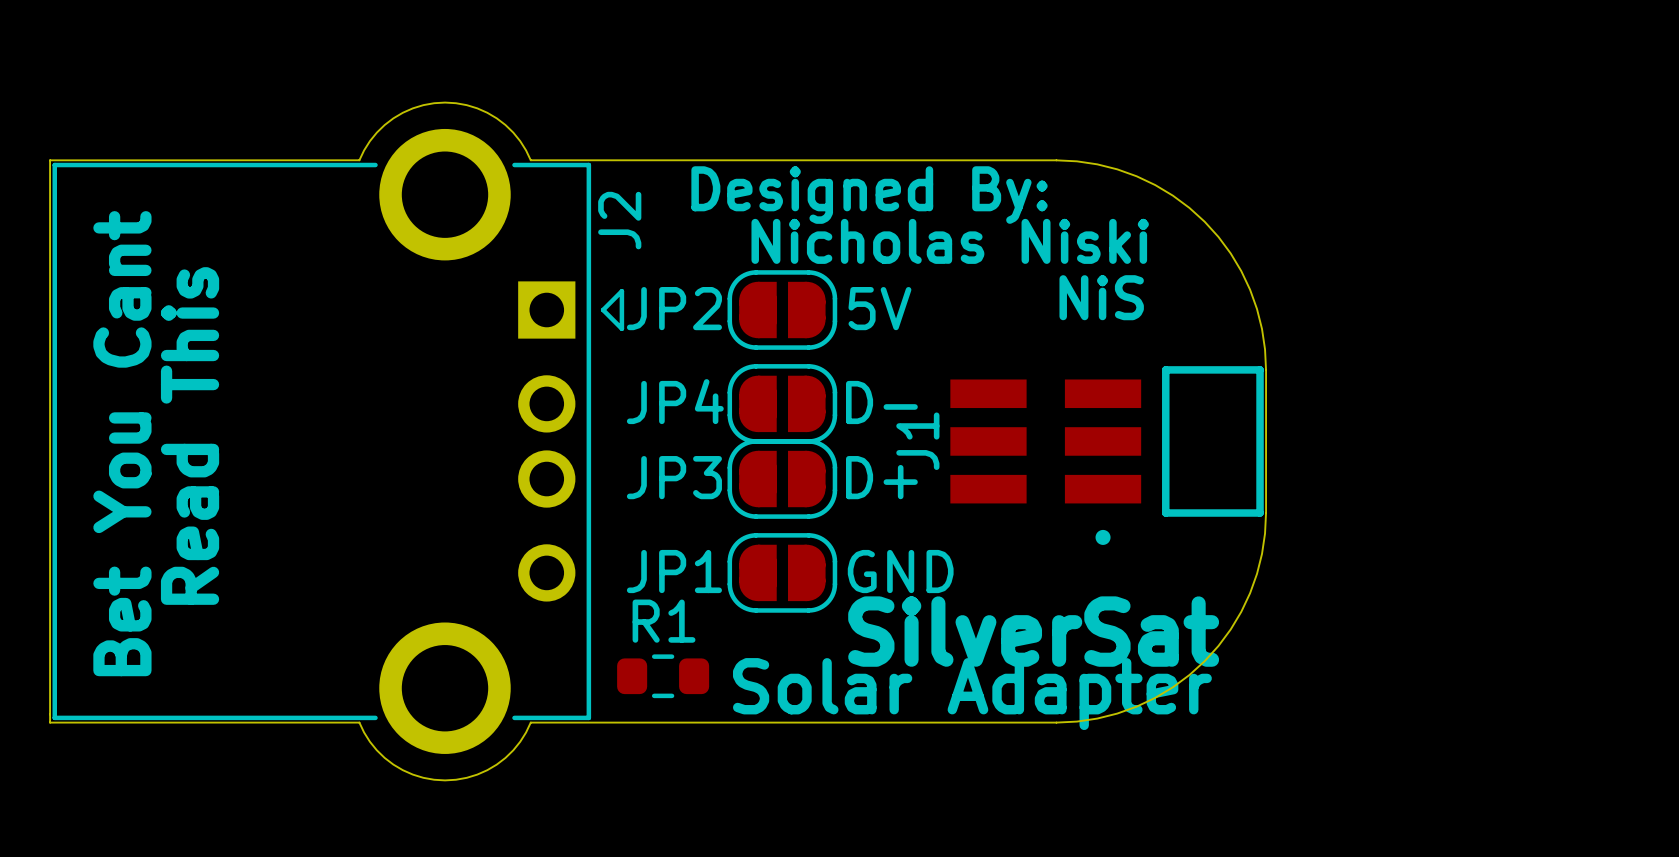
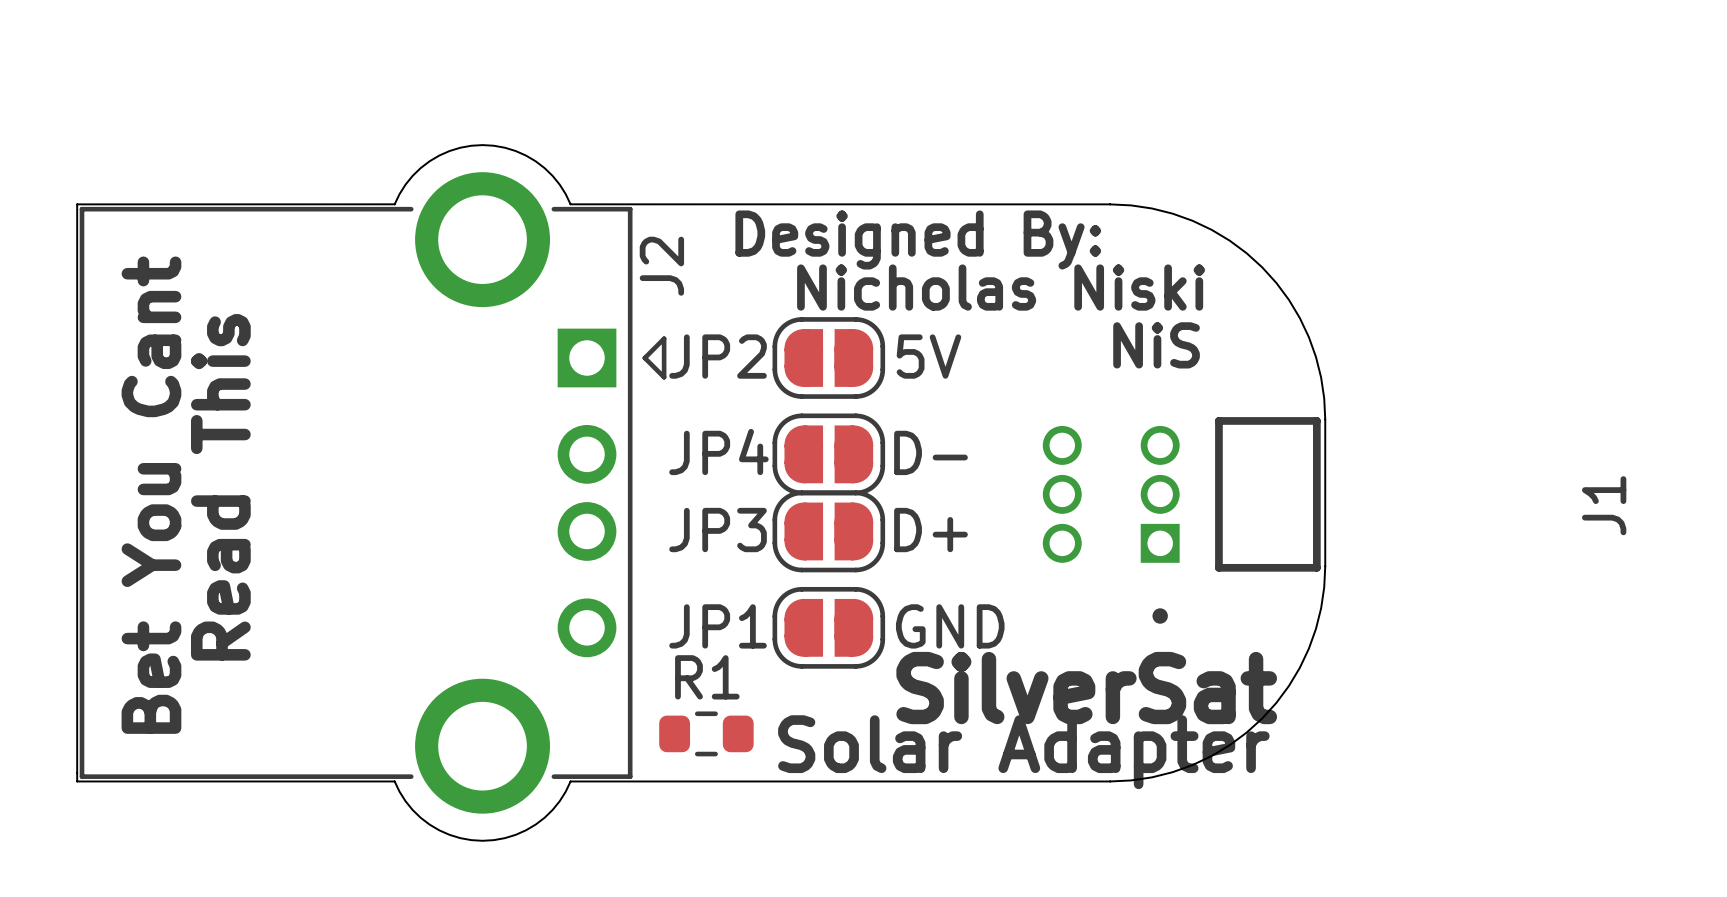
J1 footprint: [950, 366, 1264, 545] -> [1042, 417, 1321, 624]
J1 name position: J1 (917, 441) -> J1 (1604, 505)

